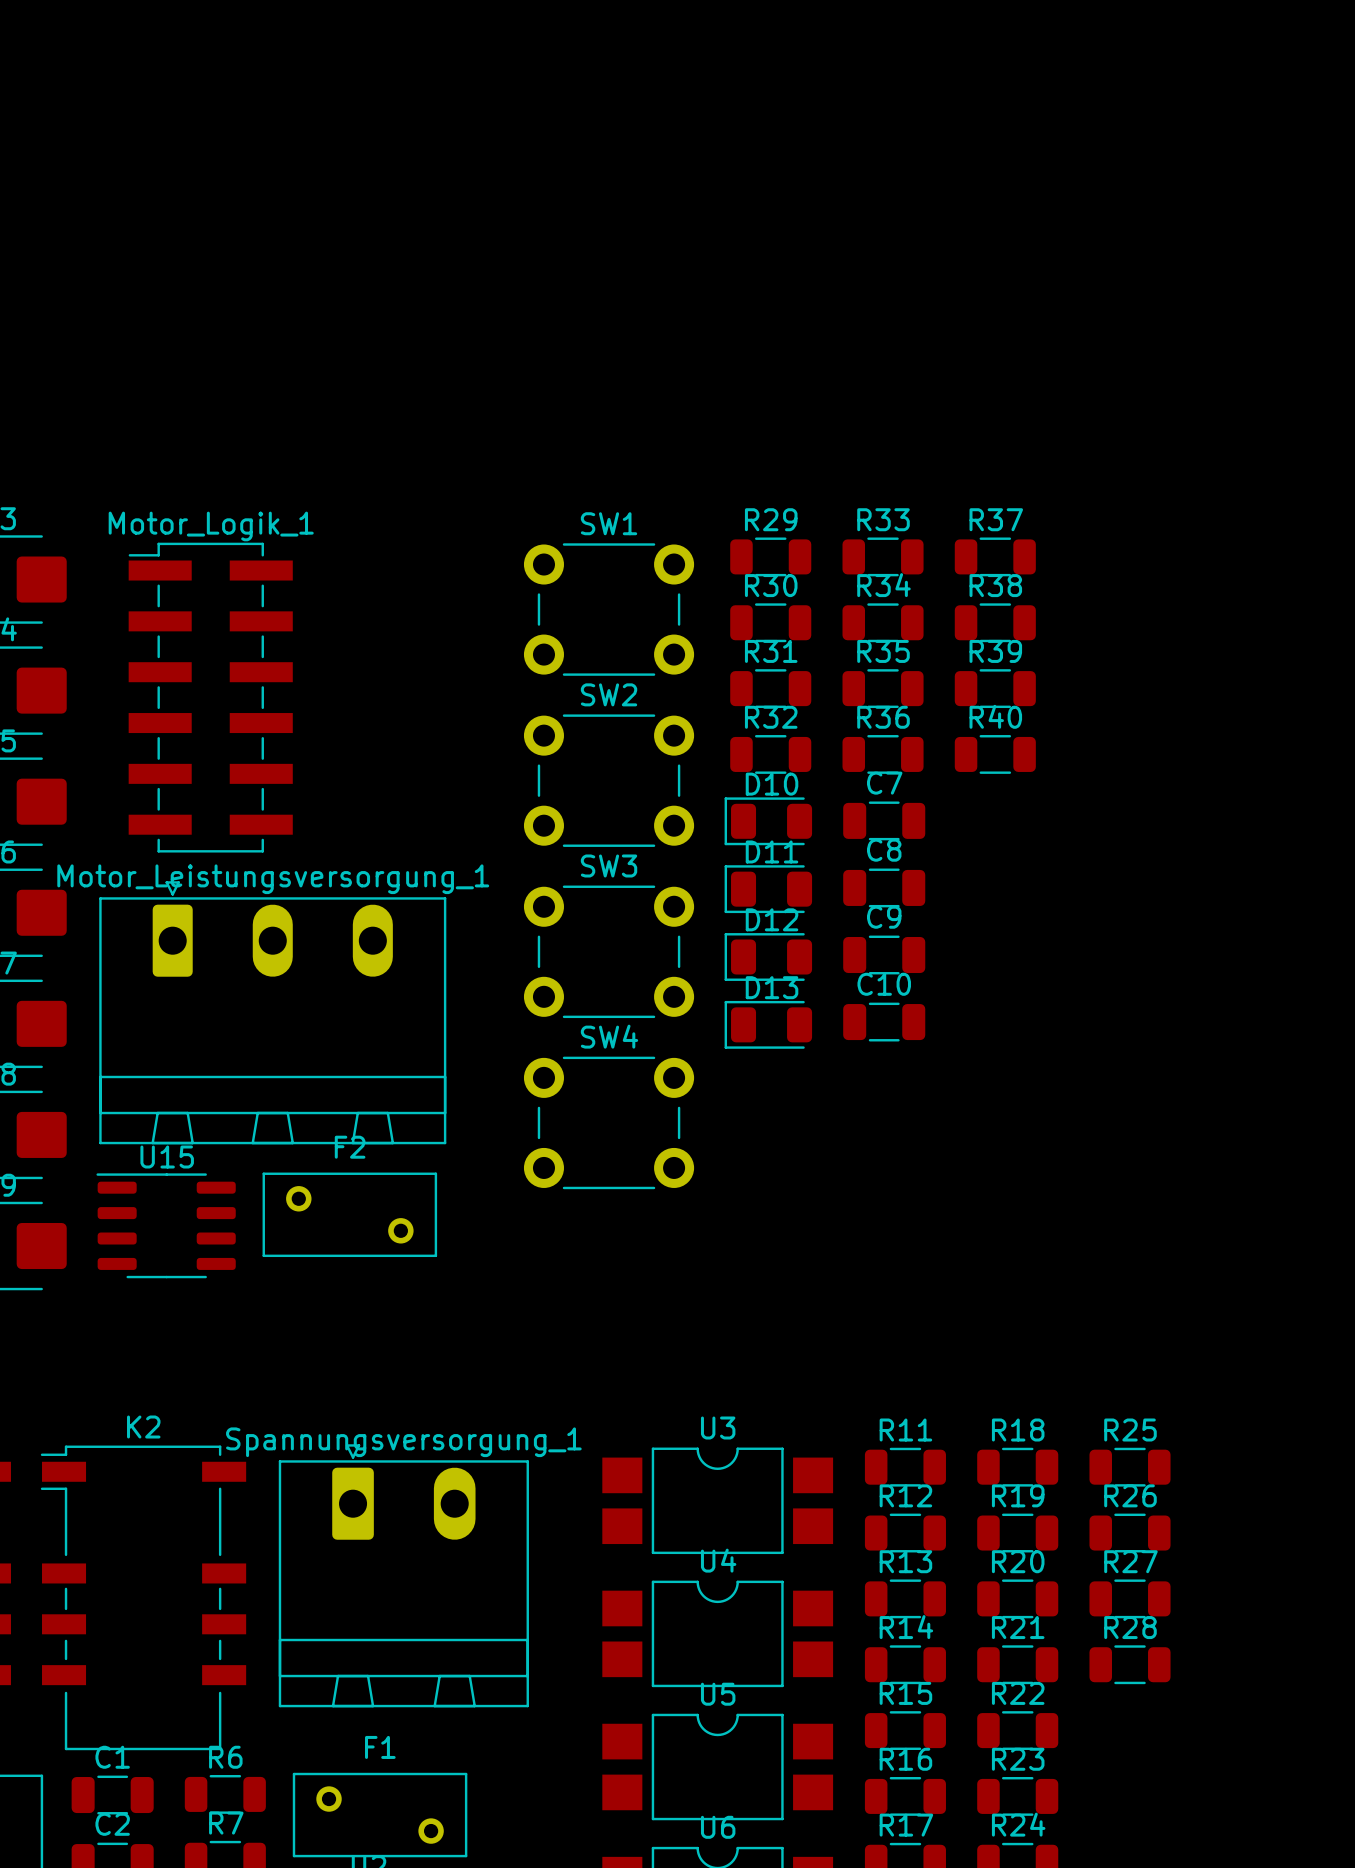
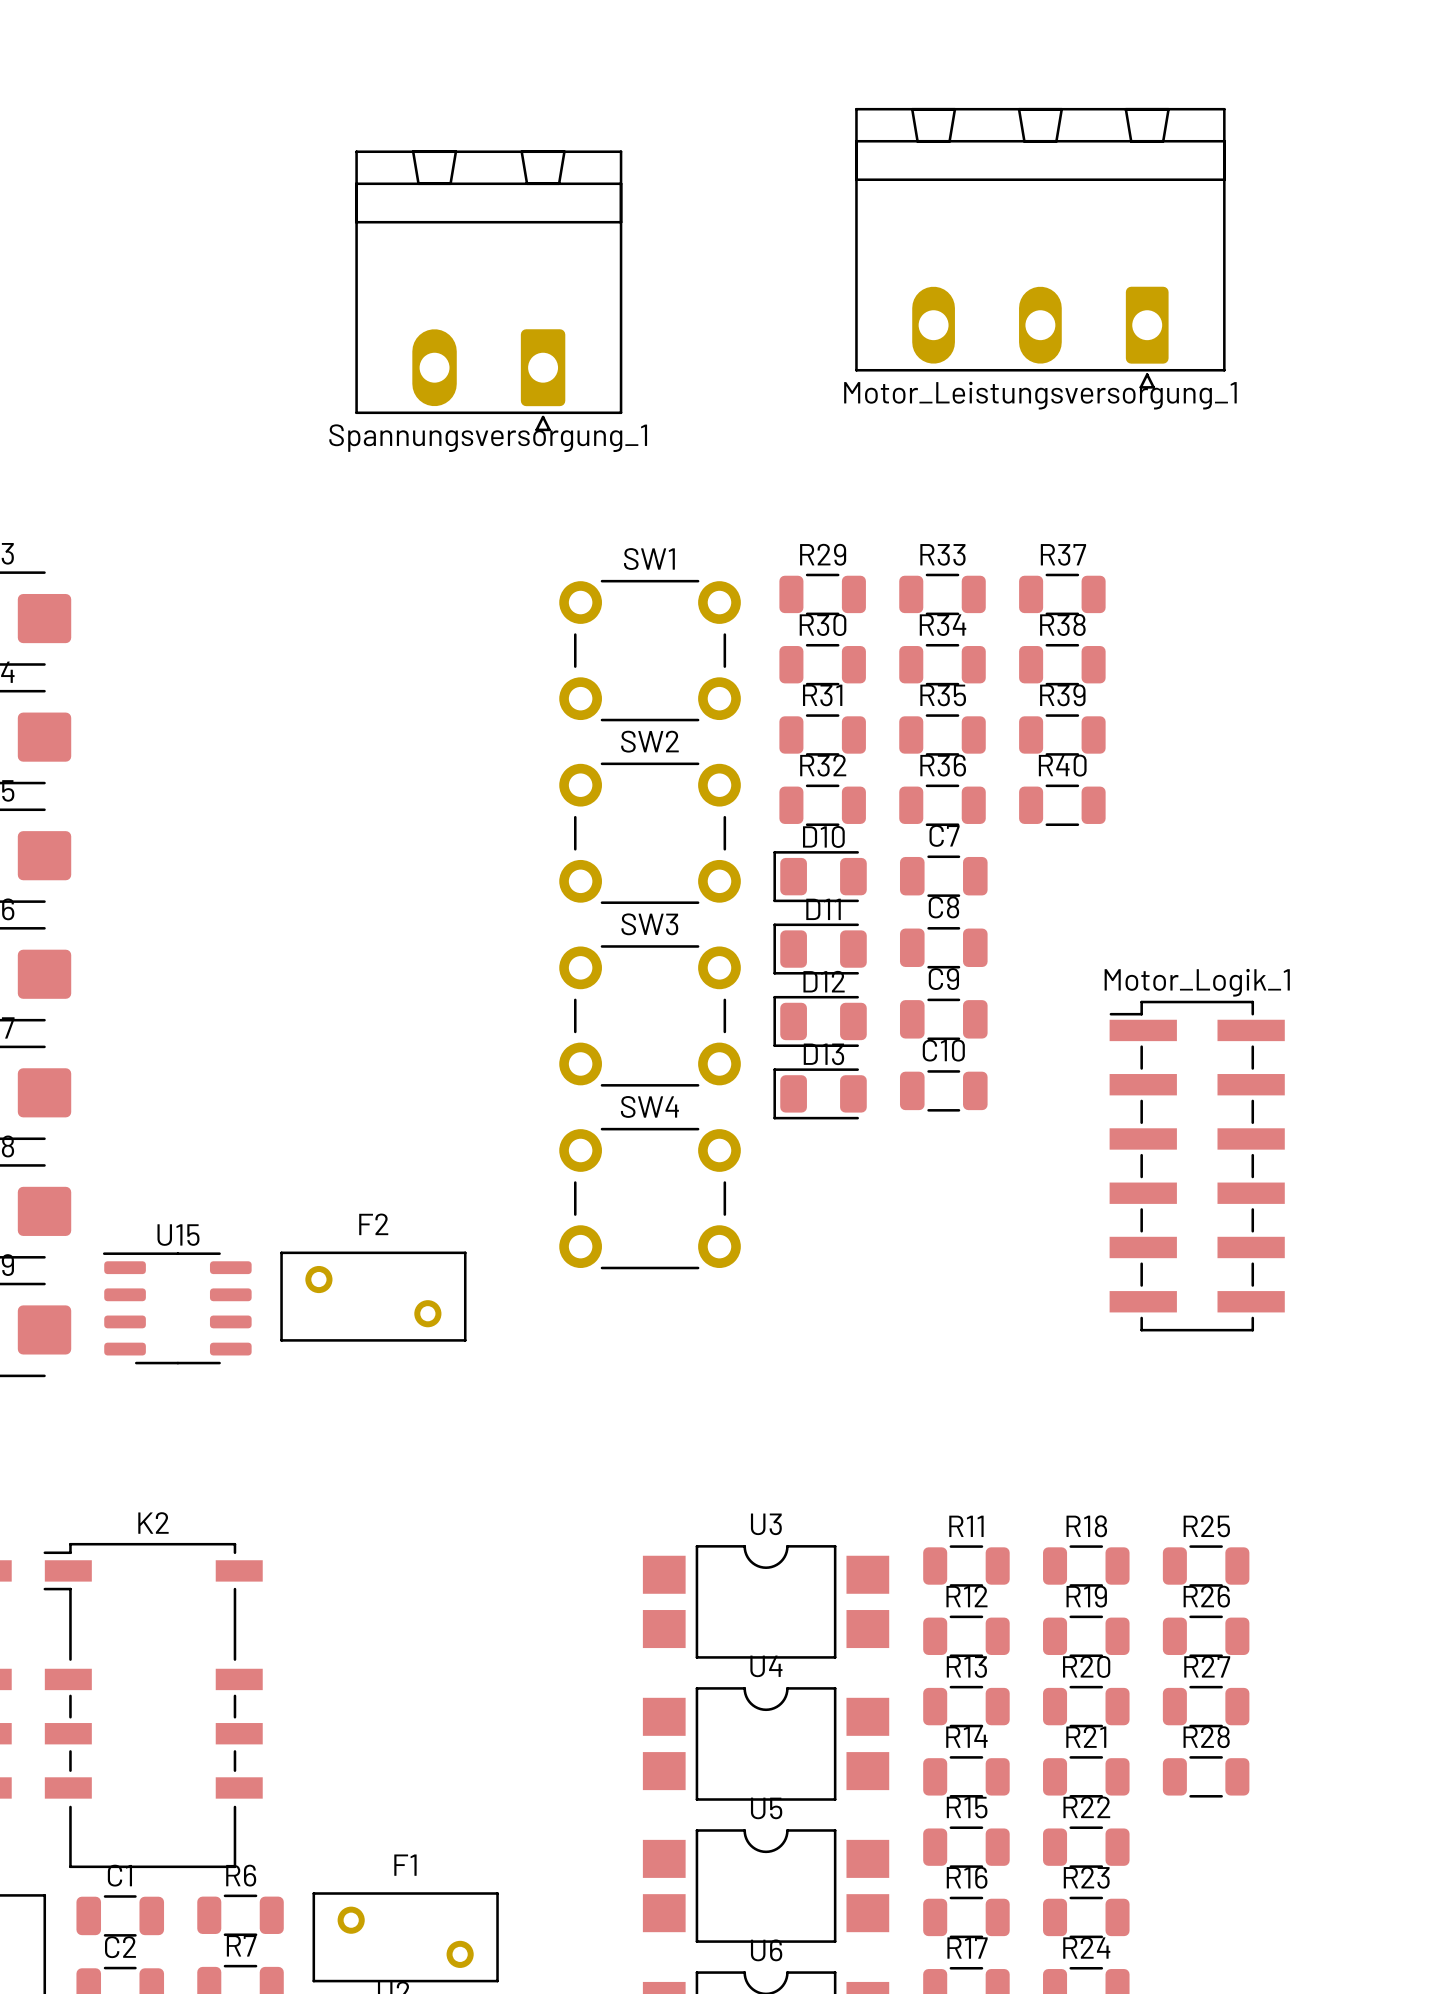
Motor_Logik_1 position: (210, 697) -> (1197, 1166)
Motor_Leistungsversorgung_1 rotation: 0° (272, 1012) -> 180° (1040, 248)
Motor_Leistungsversorgung_1 position: (272, 1012) -> (1040, 248)
Spannungsversorgung_1 rotation: 0° (403, 1575) -> 180° (488, 290)
Spannungsversorgung_1 position: (403, 1575) -> (488, 290)

